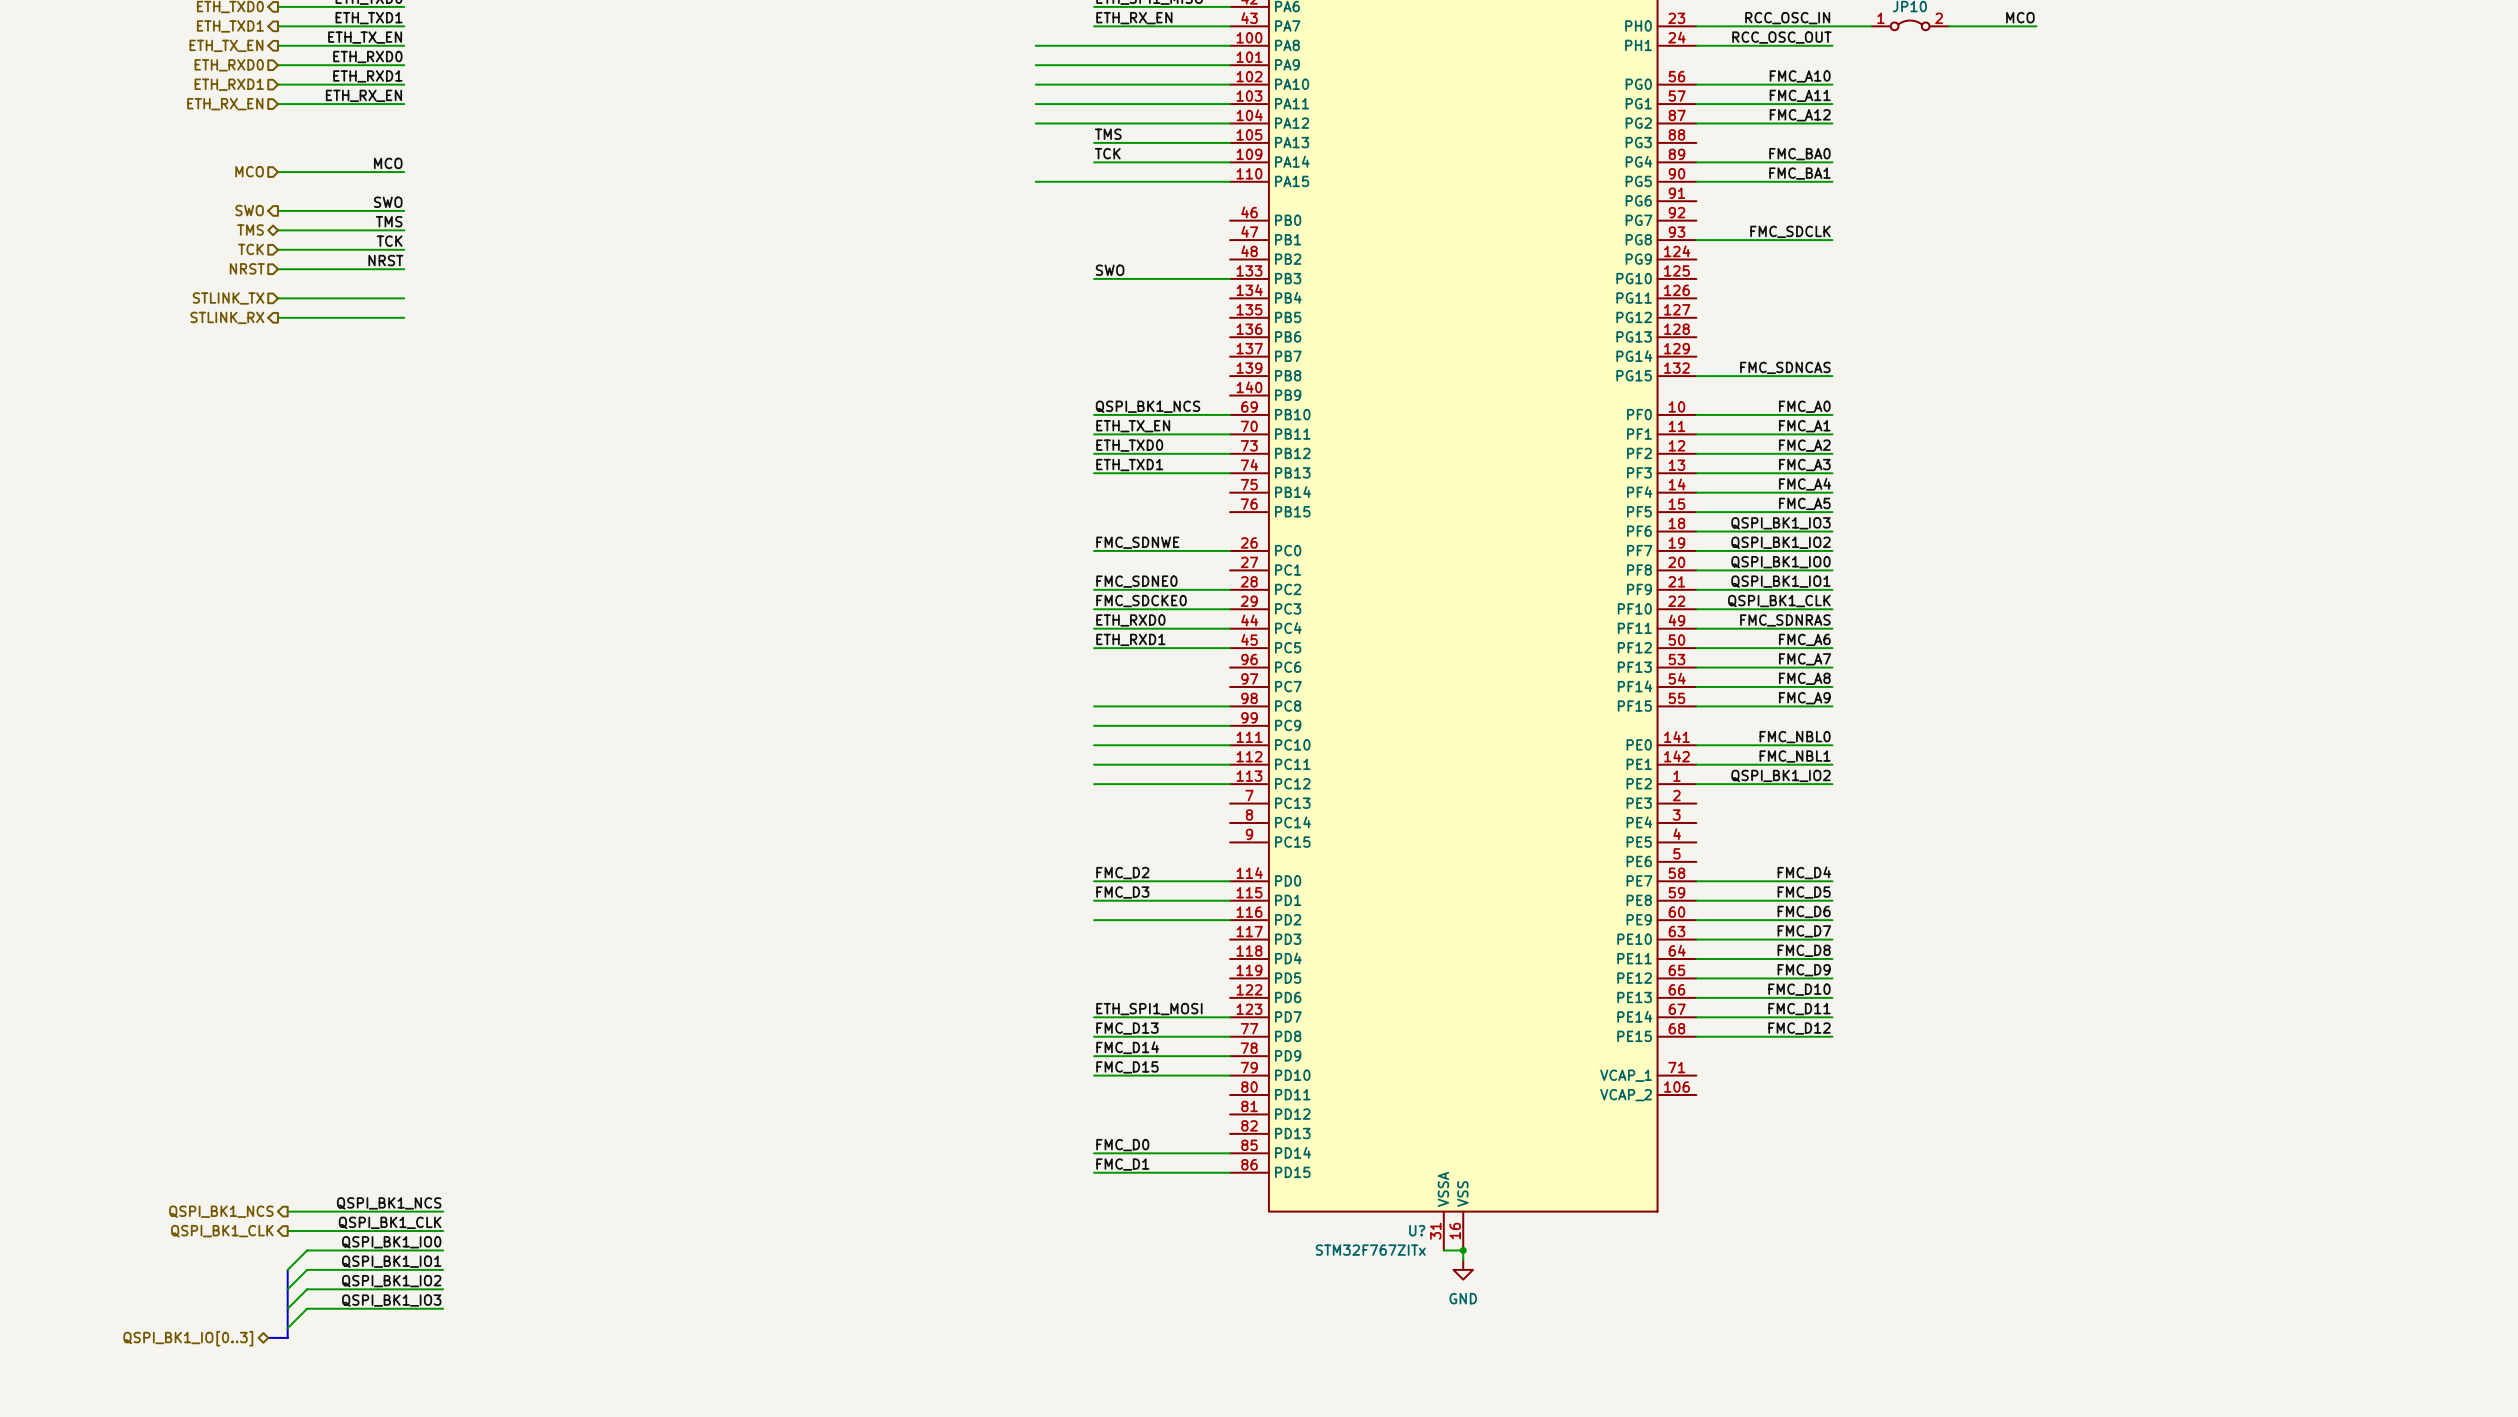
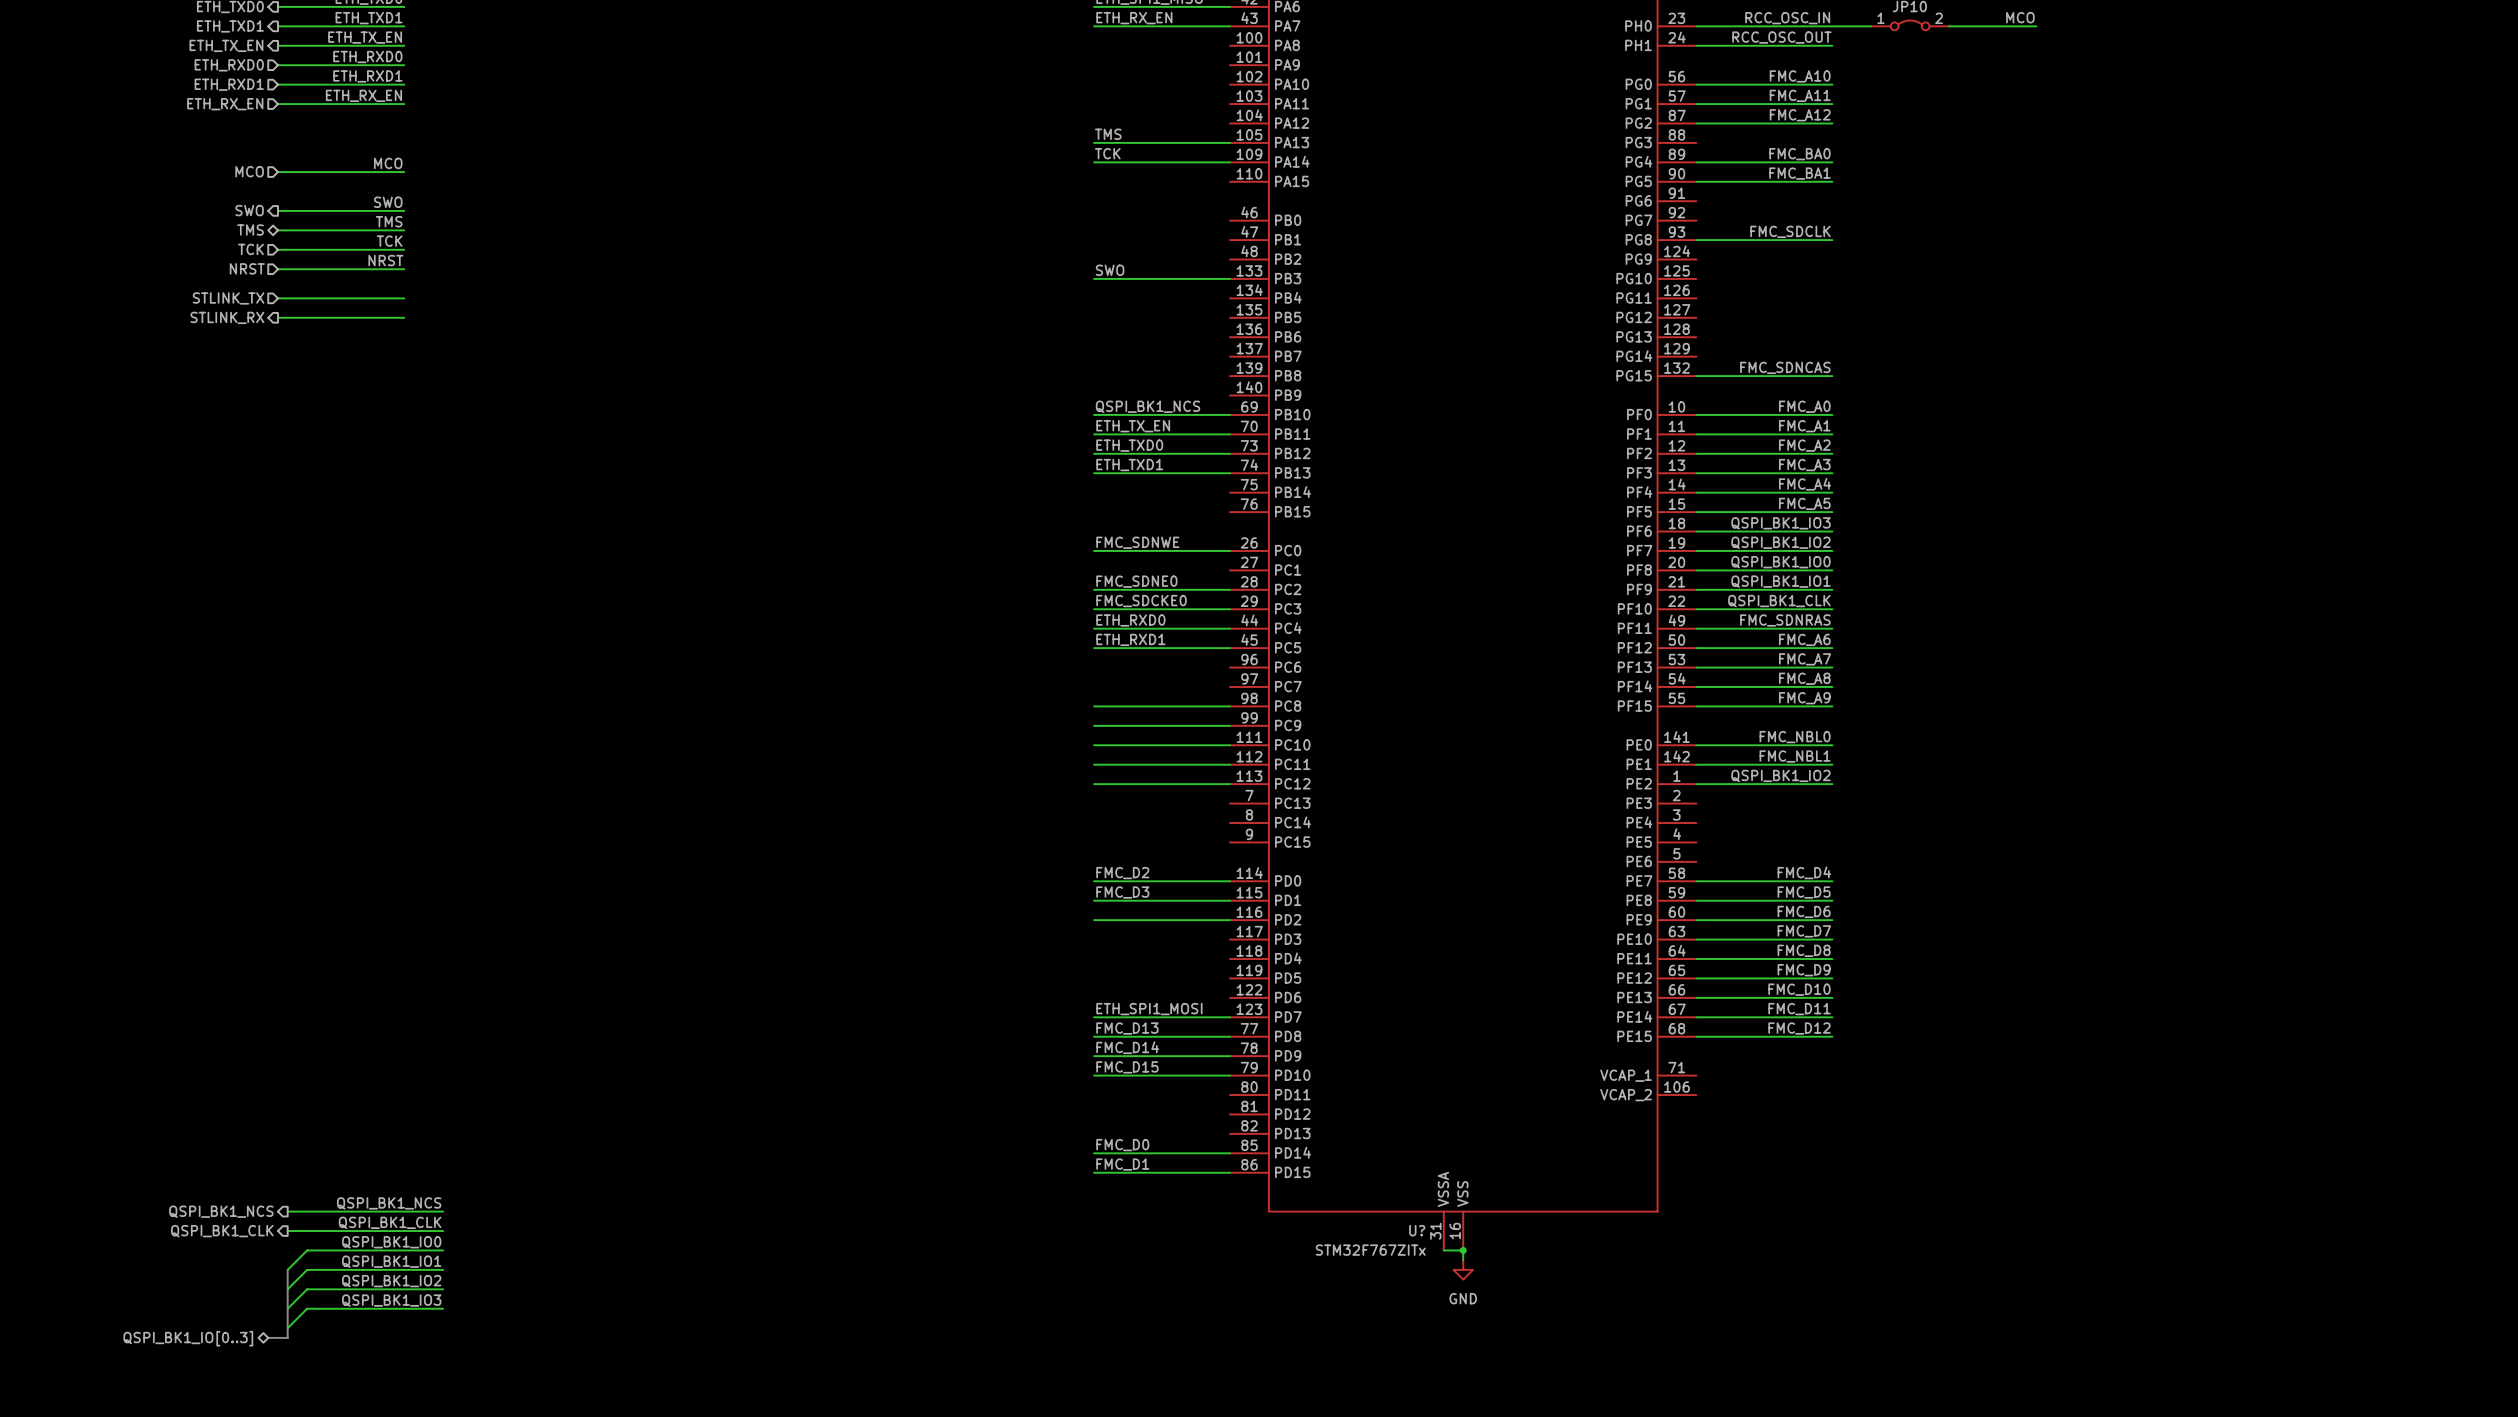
wire: (1035, 45) (1230, 45) -> none
wire: (1035, 65) (1230, 65) -> none
wire: (1035, 84) (1230, 84) -> none
wire: (1035, 104) (1230, 104) -> none
wire: (1035, 123) (1230, 123) -> none
wire: (1035, 181) (1230, 181) -> none

